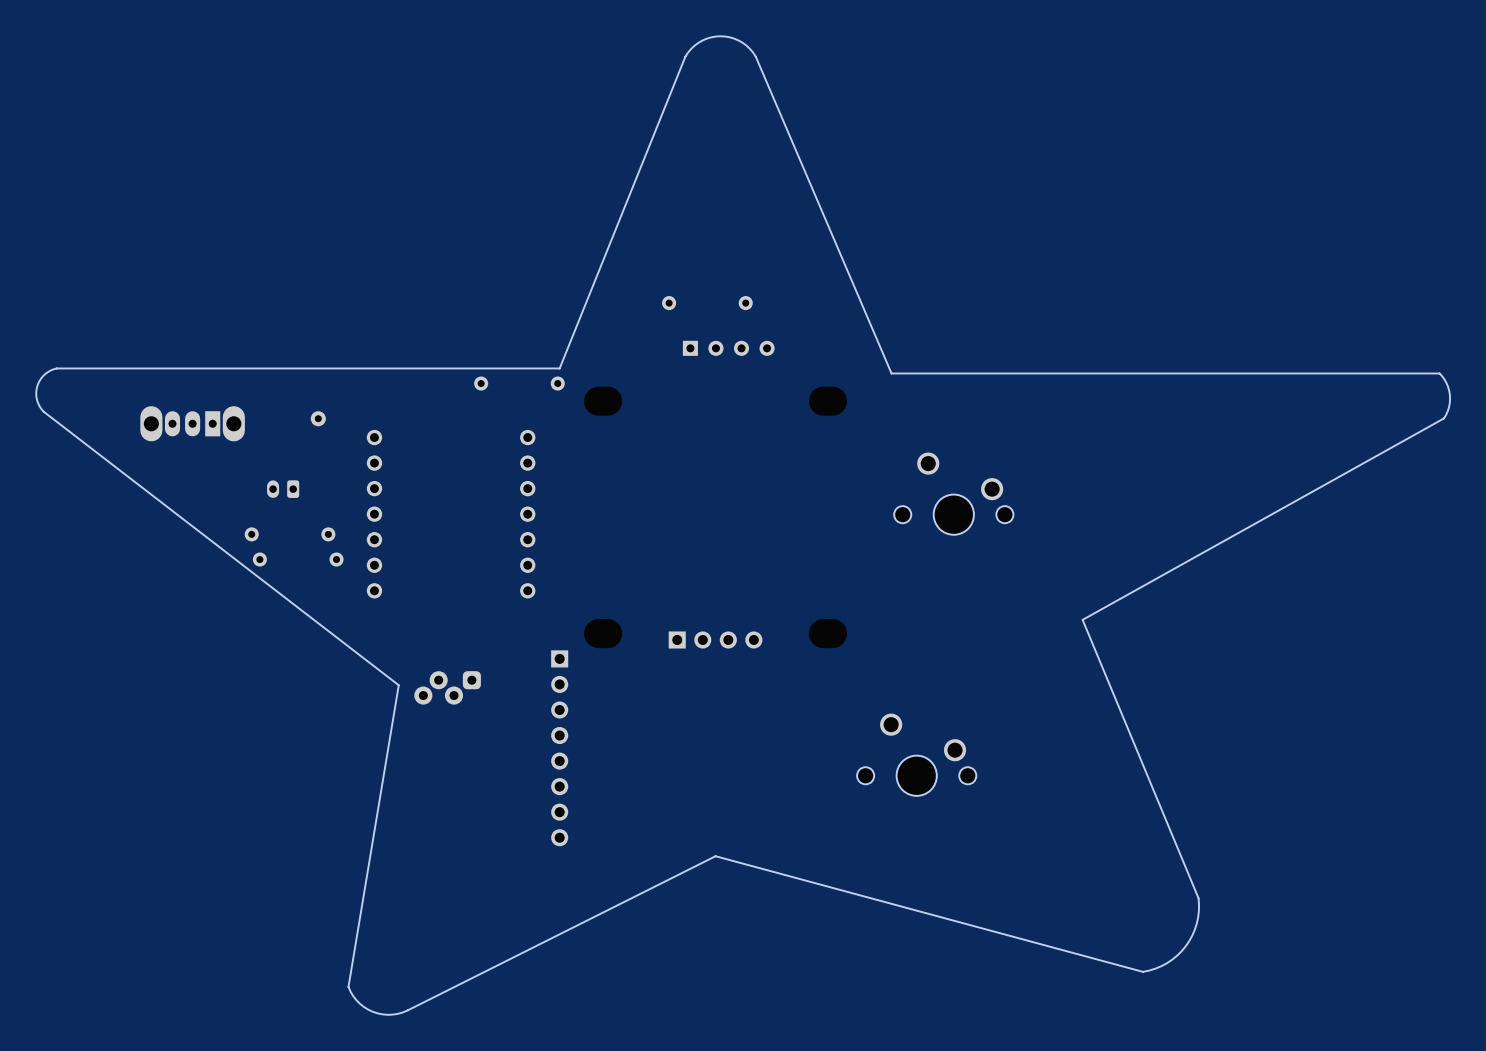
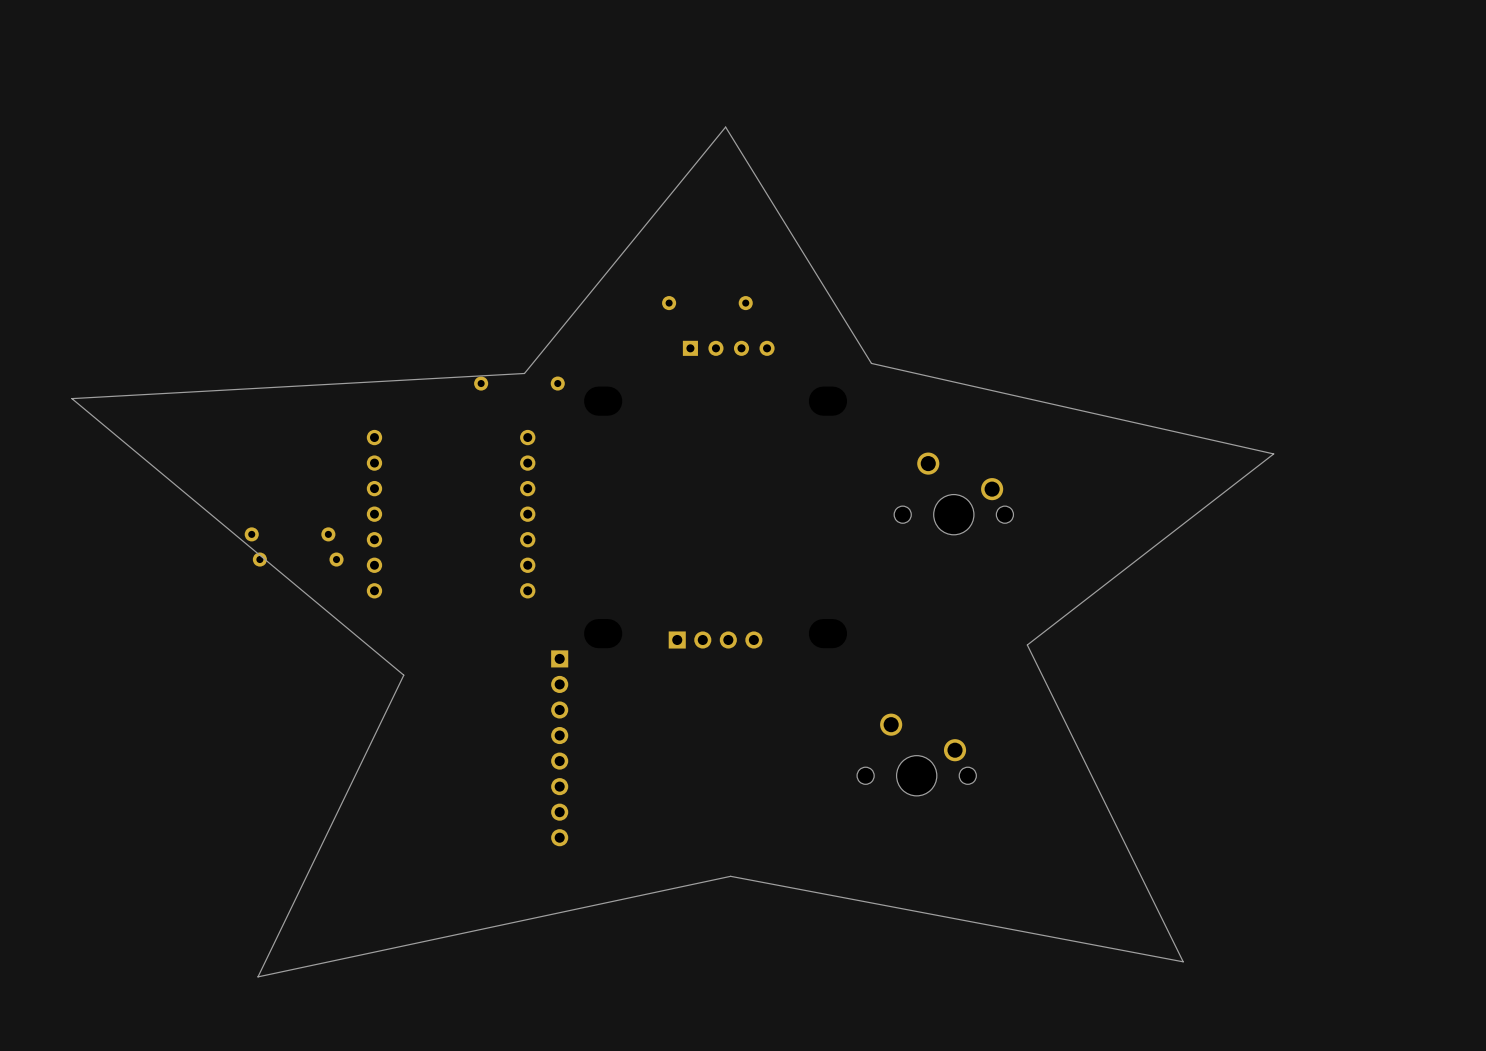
board edge: (755, 56) (891, 373) (1439, 373) (1449, 391) (1447, 411) (1444, 418) (1082, 619) (1198, 898) (1198, 917) (1192, 935) (1181, 951) (1166, 963) (1142, 971) (715, 856) (407, 1010) (388, 1014) (373, 1011) (356, 1000) (348, 986) (398, 685) (43, 411) (36, 398) (38, 383) (45, 373) (56, 368) (559, 368) (685, 56) (698, 42) (706, 38) (720, 36) (734, 38) (742, 42) (755, 56) -> (725, 127) (871, 363) (1273, 453) (1027, 645) (1183, 961) (730, 876) (257, 976) (403, 675) (71, 398) (524, 373) (725, 127)
part: (318, 418) -> none
part: (192, 423) -> none
part: (283, 489) -> none
part: (447, 687) -> none

